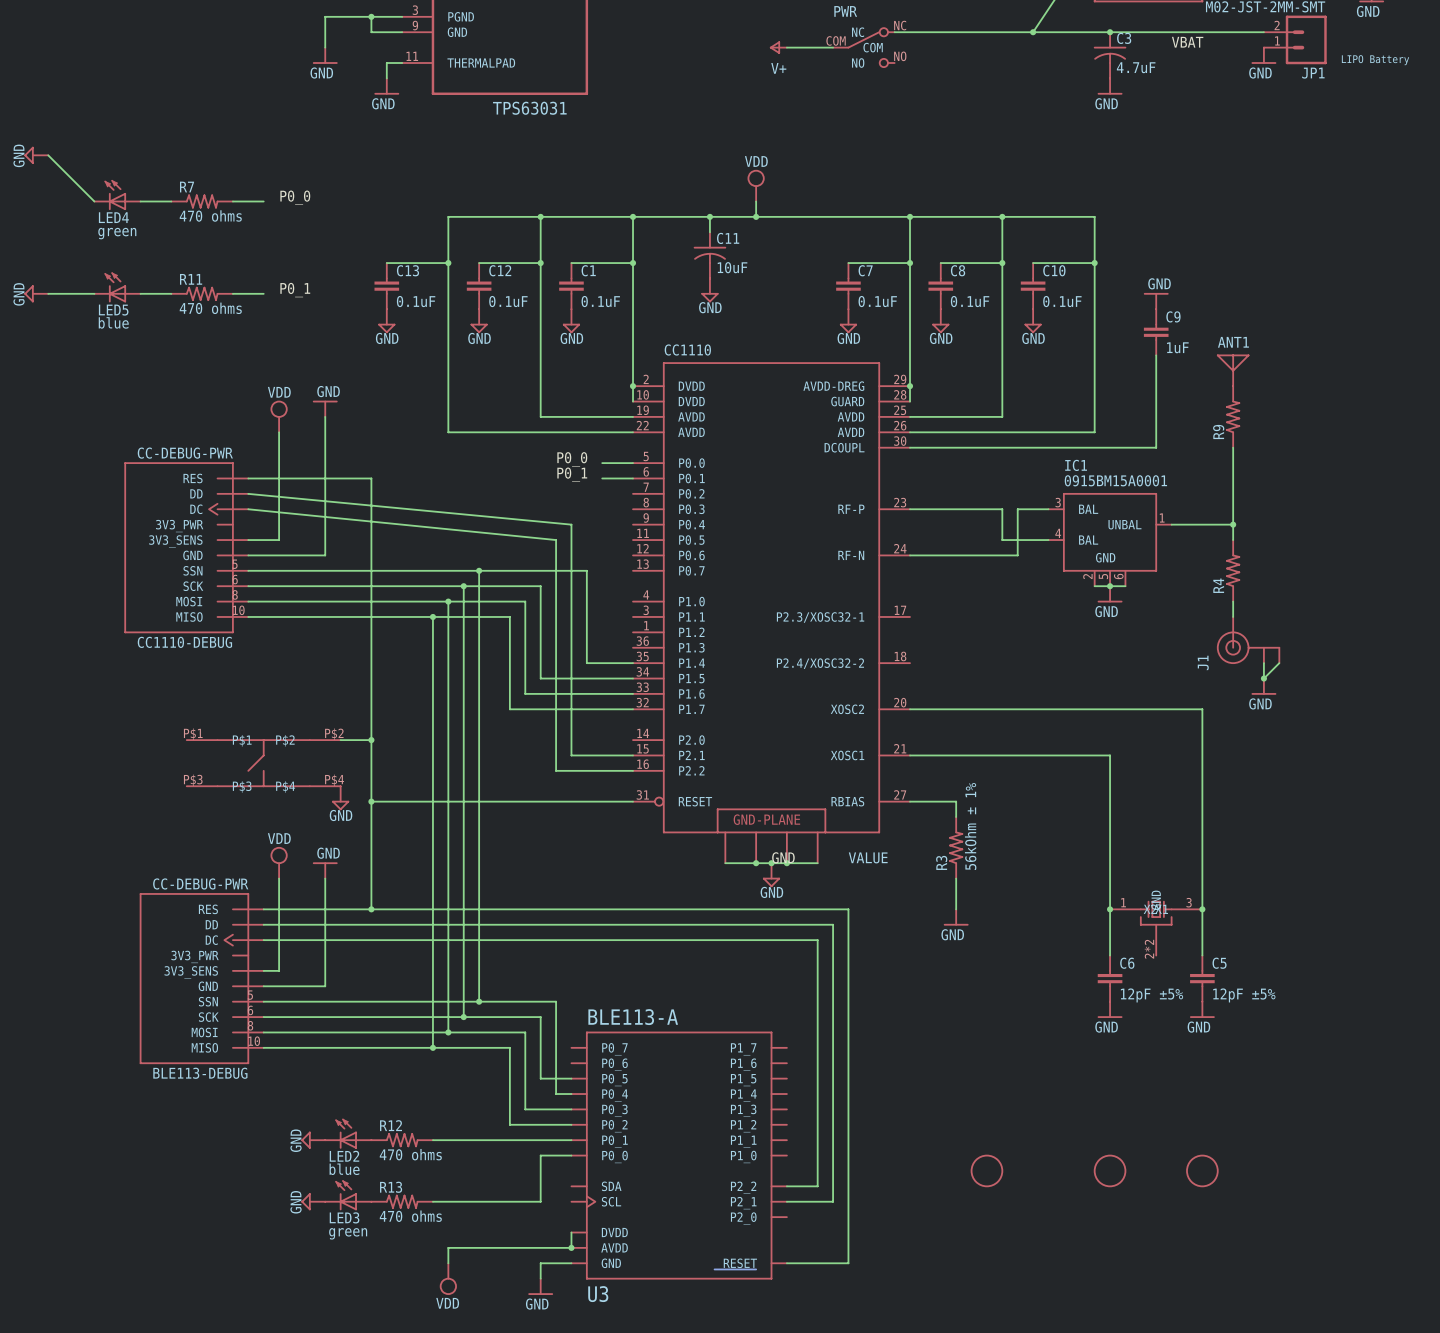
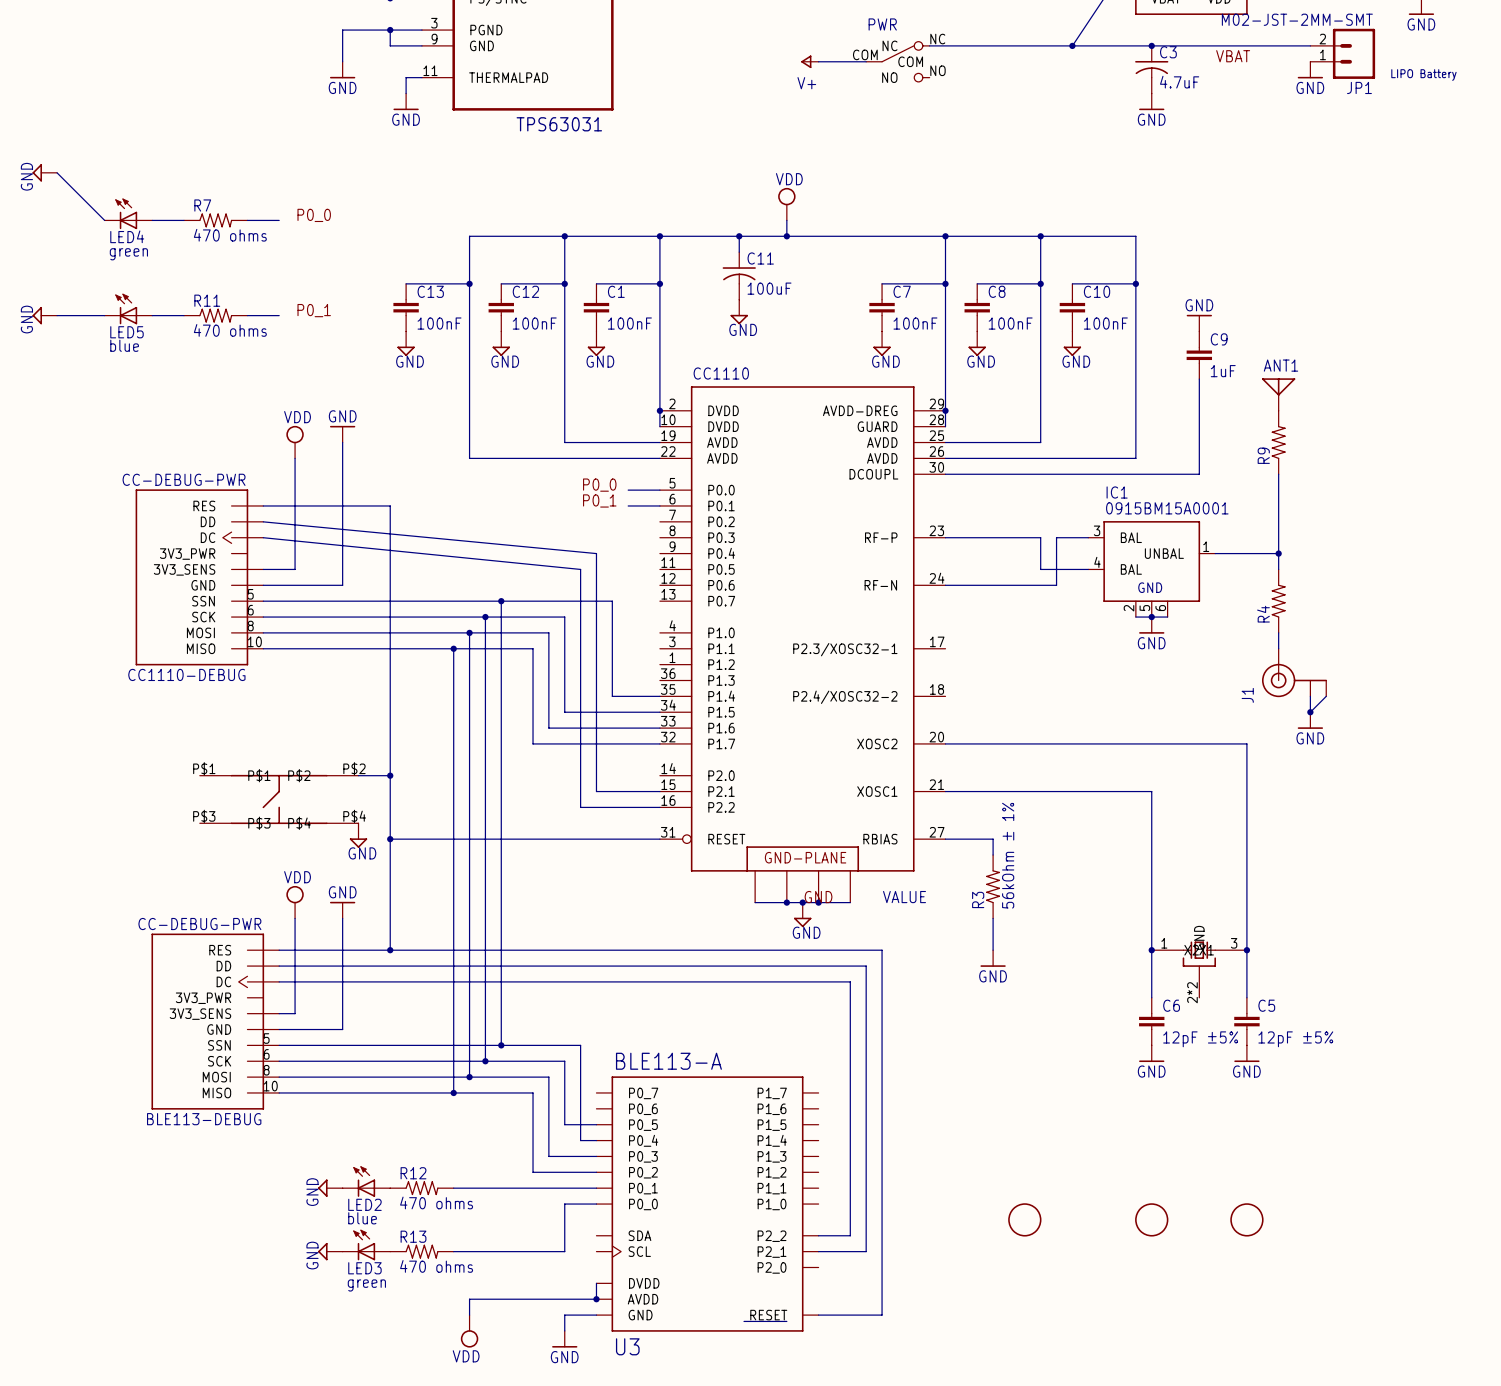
C11 value: 10uF (732, 267) -> 100uF (769, 288)
C13 value: 0.1uF (416, 301) -> 100nF (439, 323)
C12 value: 0.1uF (508, 301) -> 100nF (534, 323)
C1 value: 0.1uF (600, 301) -> 100nF (629, 323)
C7 value: 0.1uF (877, 301) -> 100nF (915, 323)
C8 value: 0.1uF (970, 301) -> 100nF (1010, 323)
C10 value: 0.1uF (1062, 301) -> 100nF (1105, 323)

